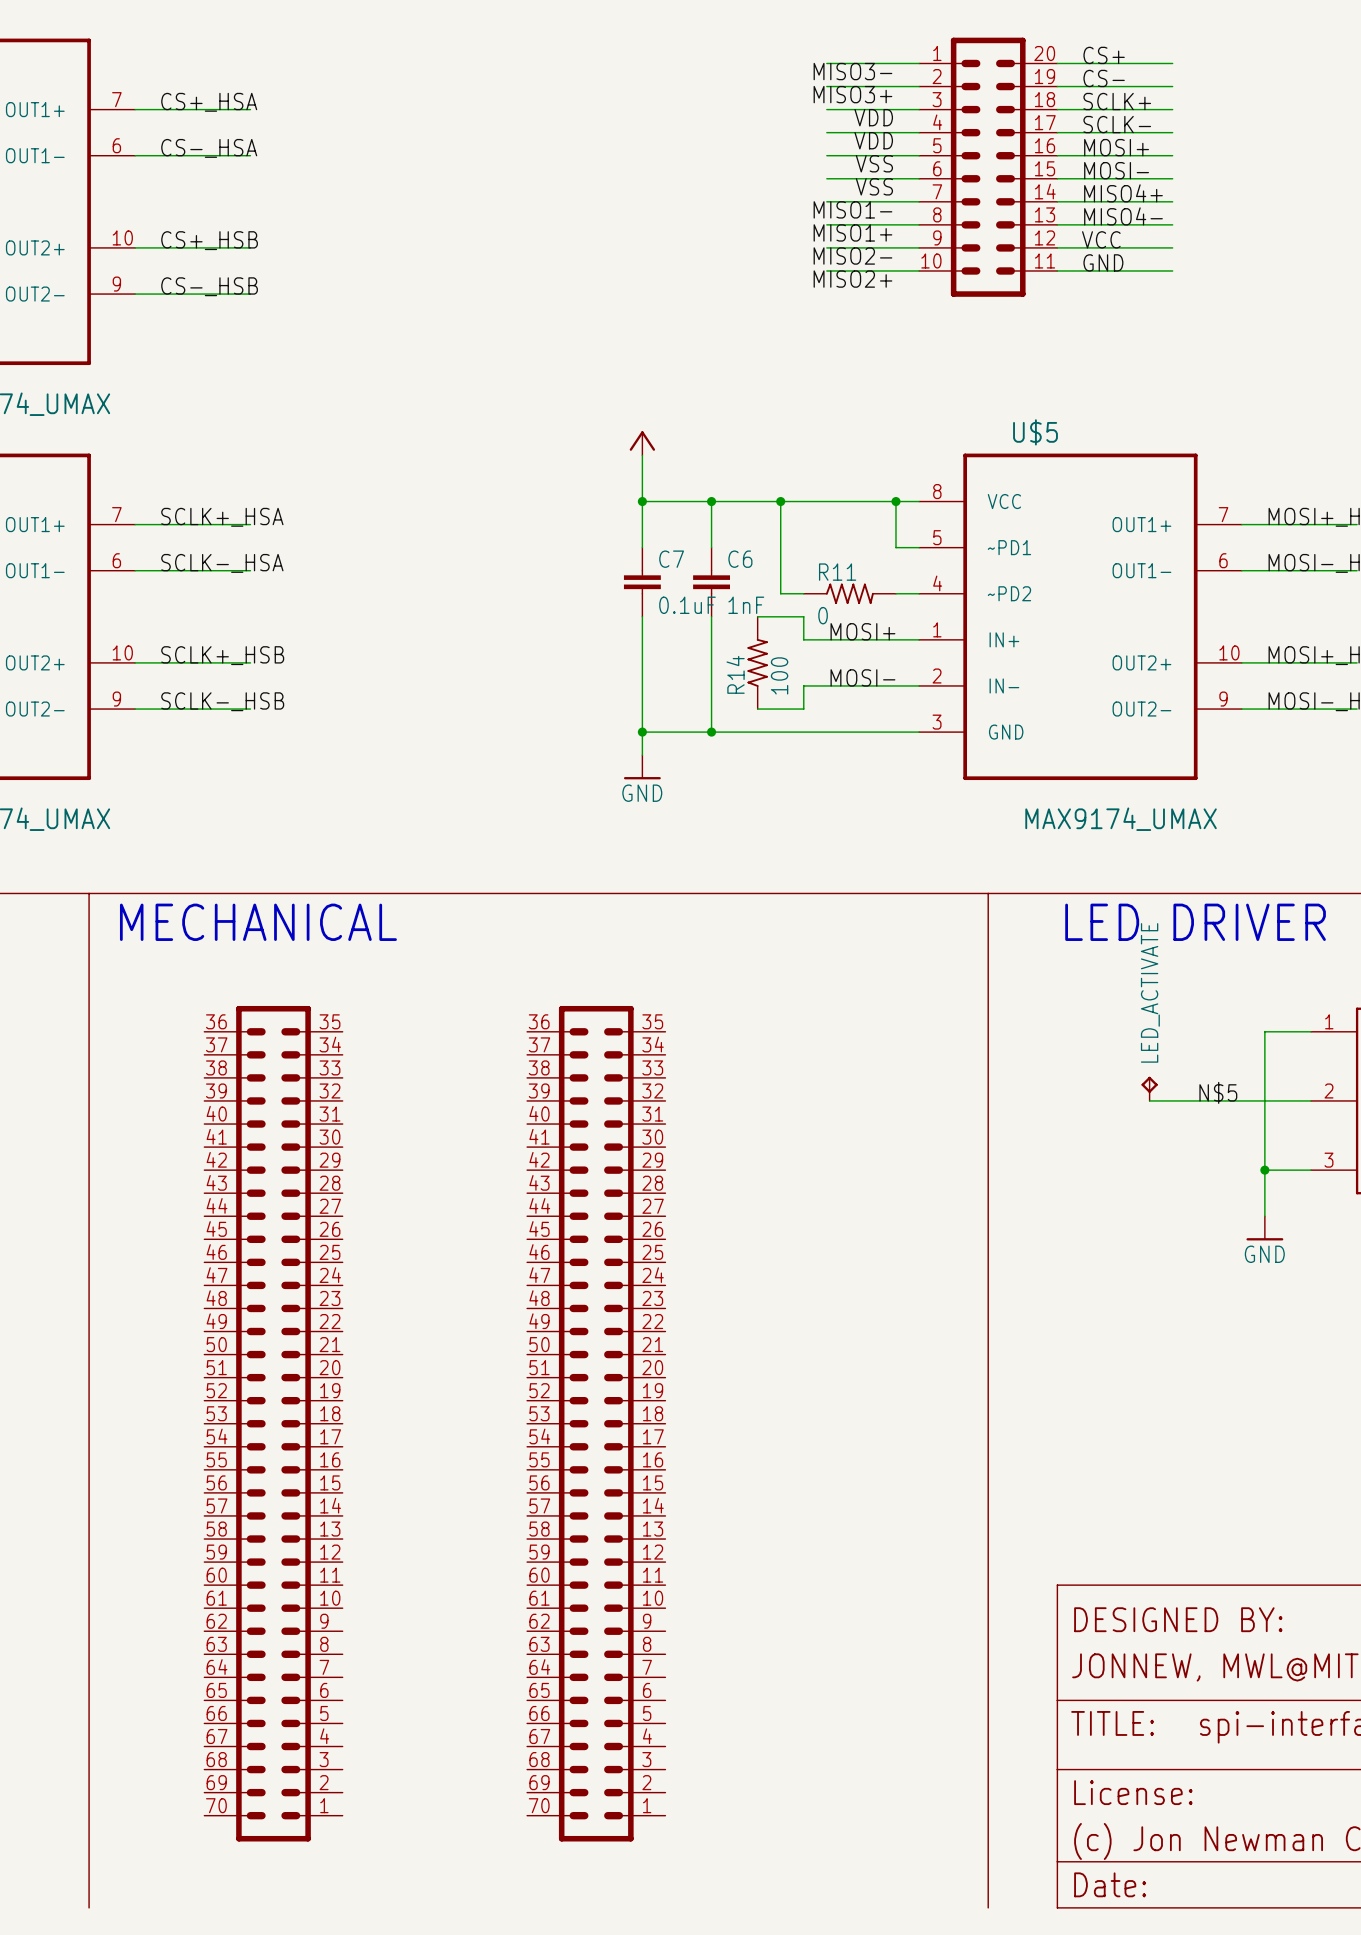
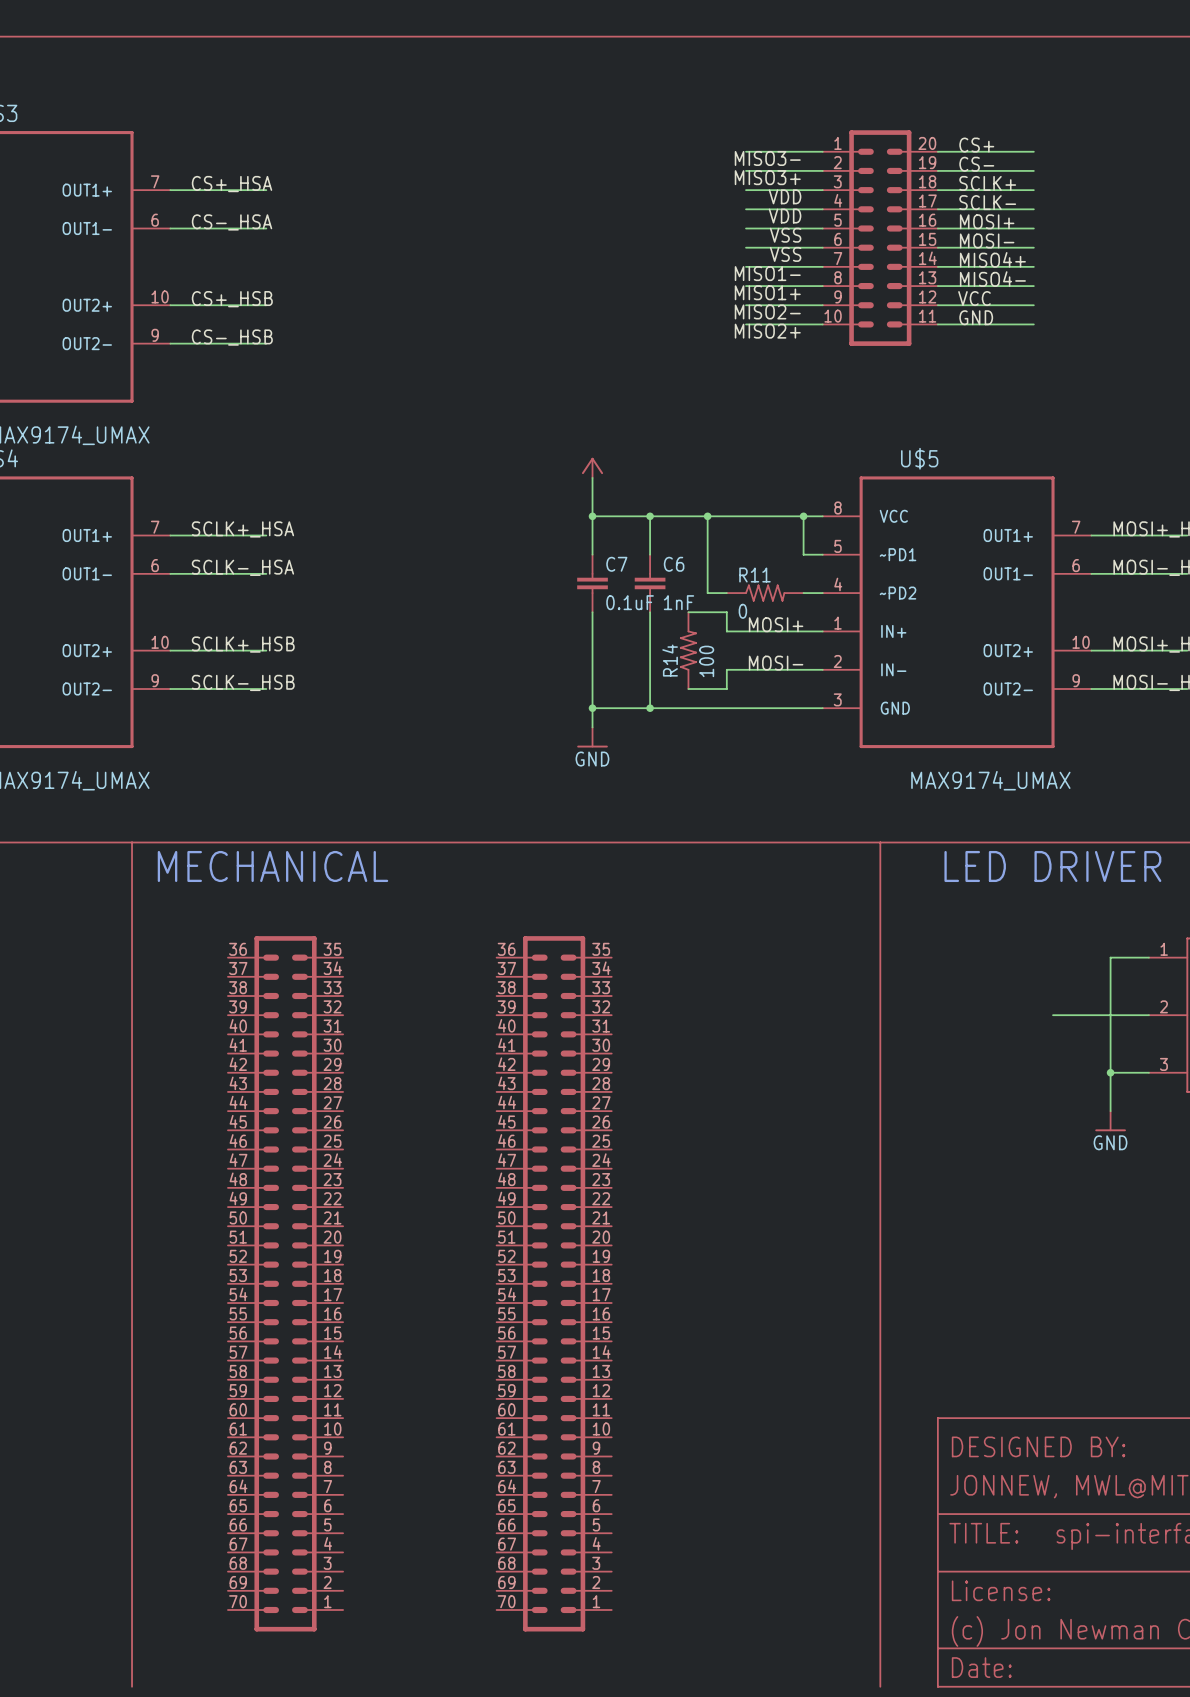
LED_ACTIVATE: (1149, 1088) -> none
label: N$5 (1218, 1092) -> none
wire: (1149, 1100) (1195, 1100) -> none

